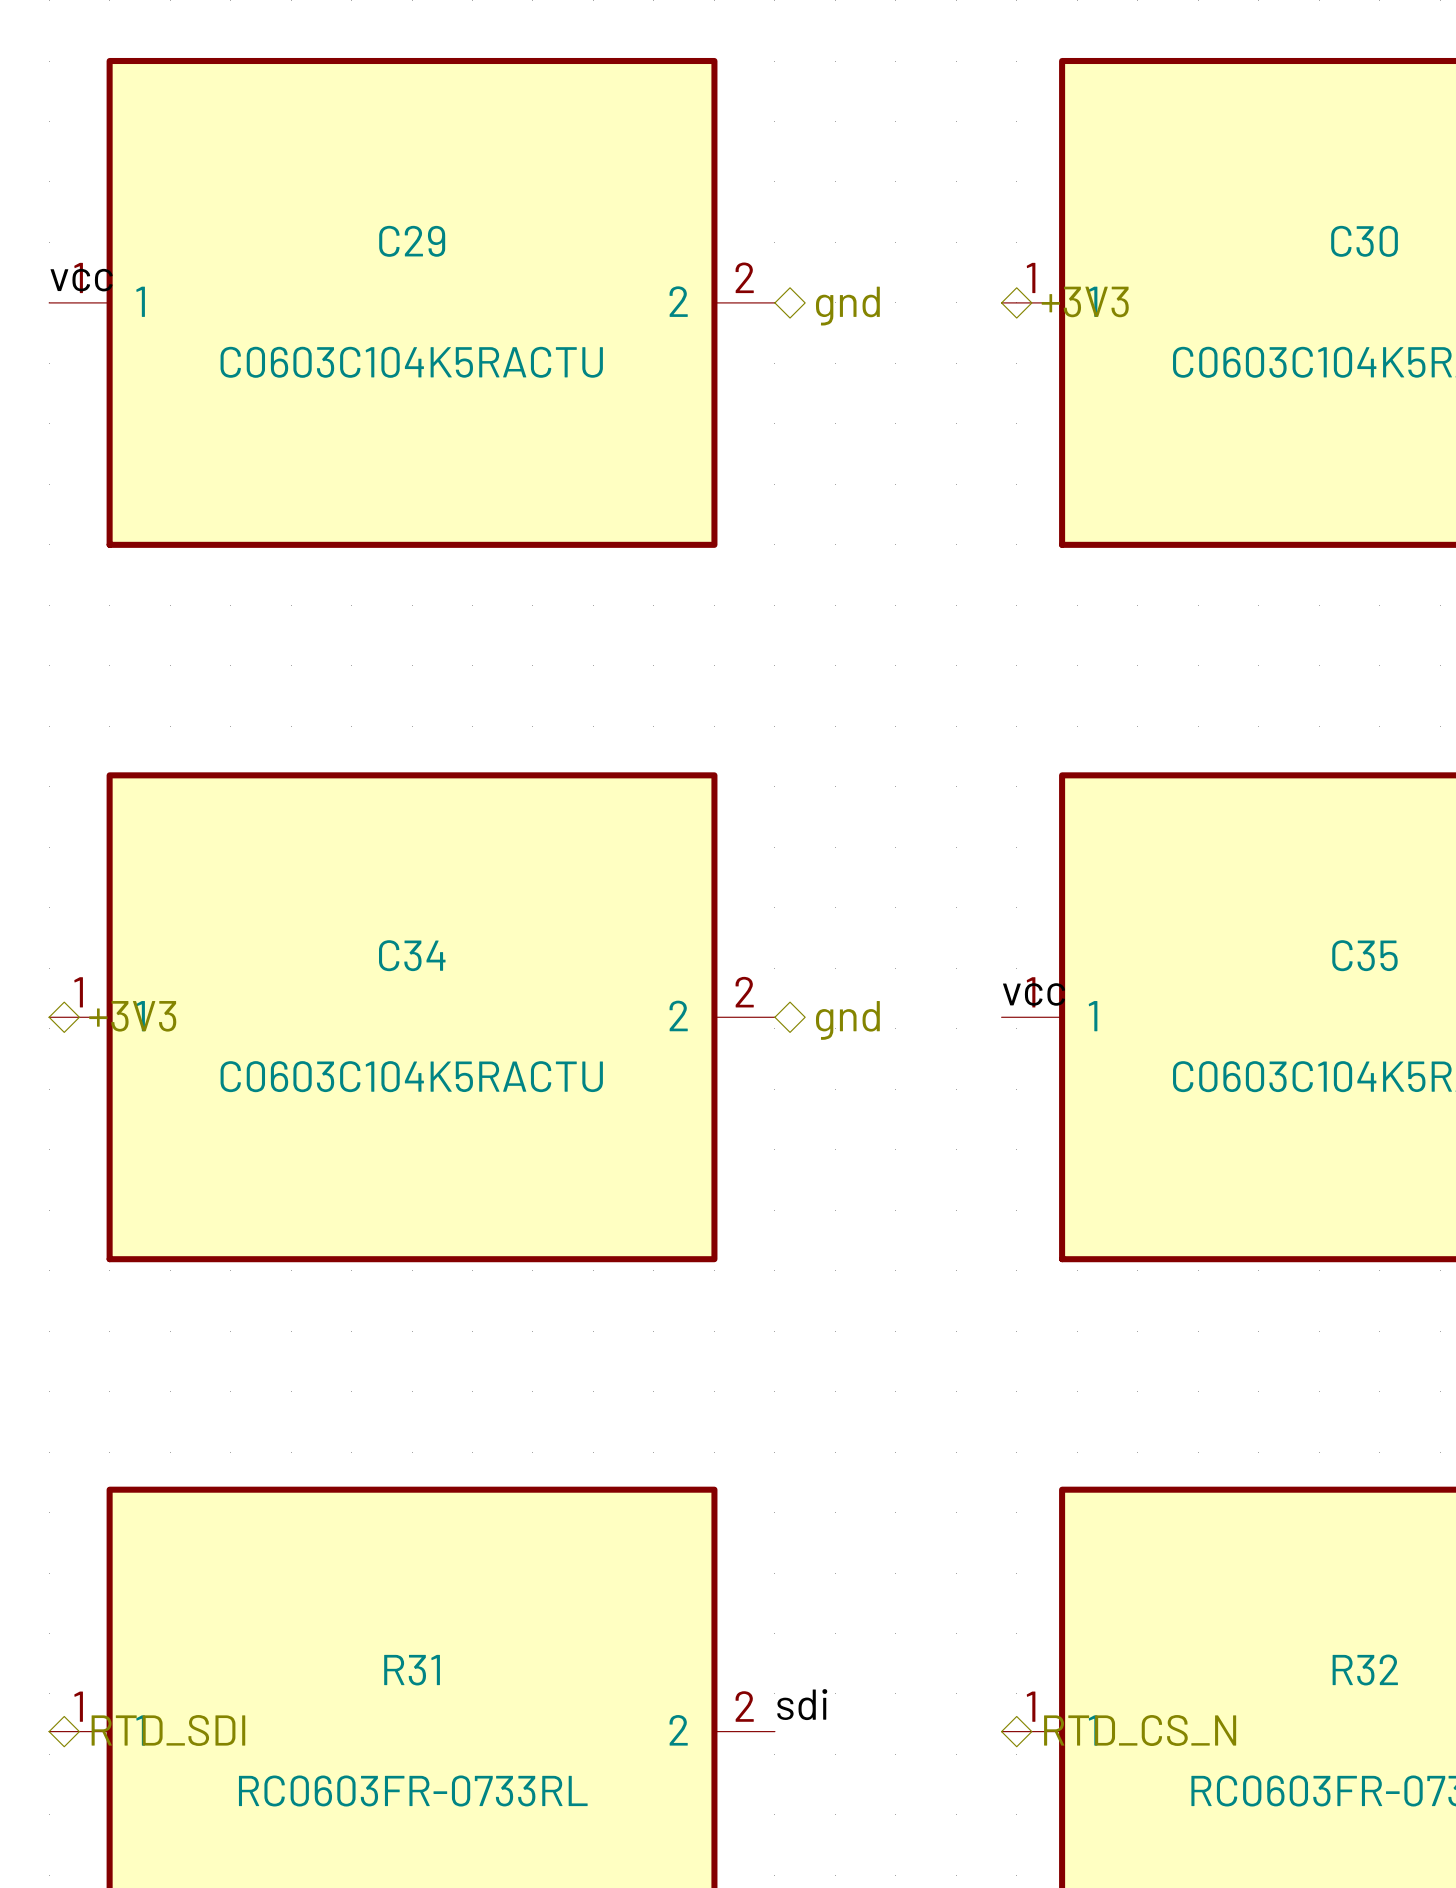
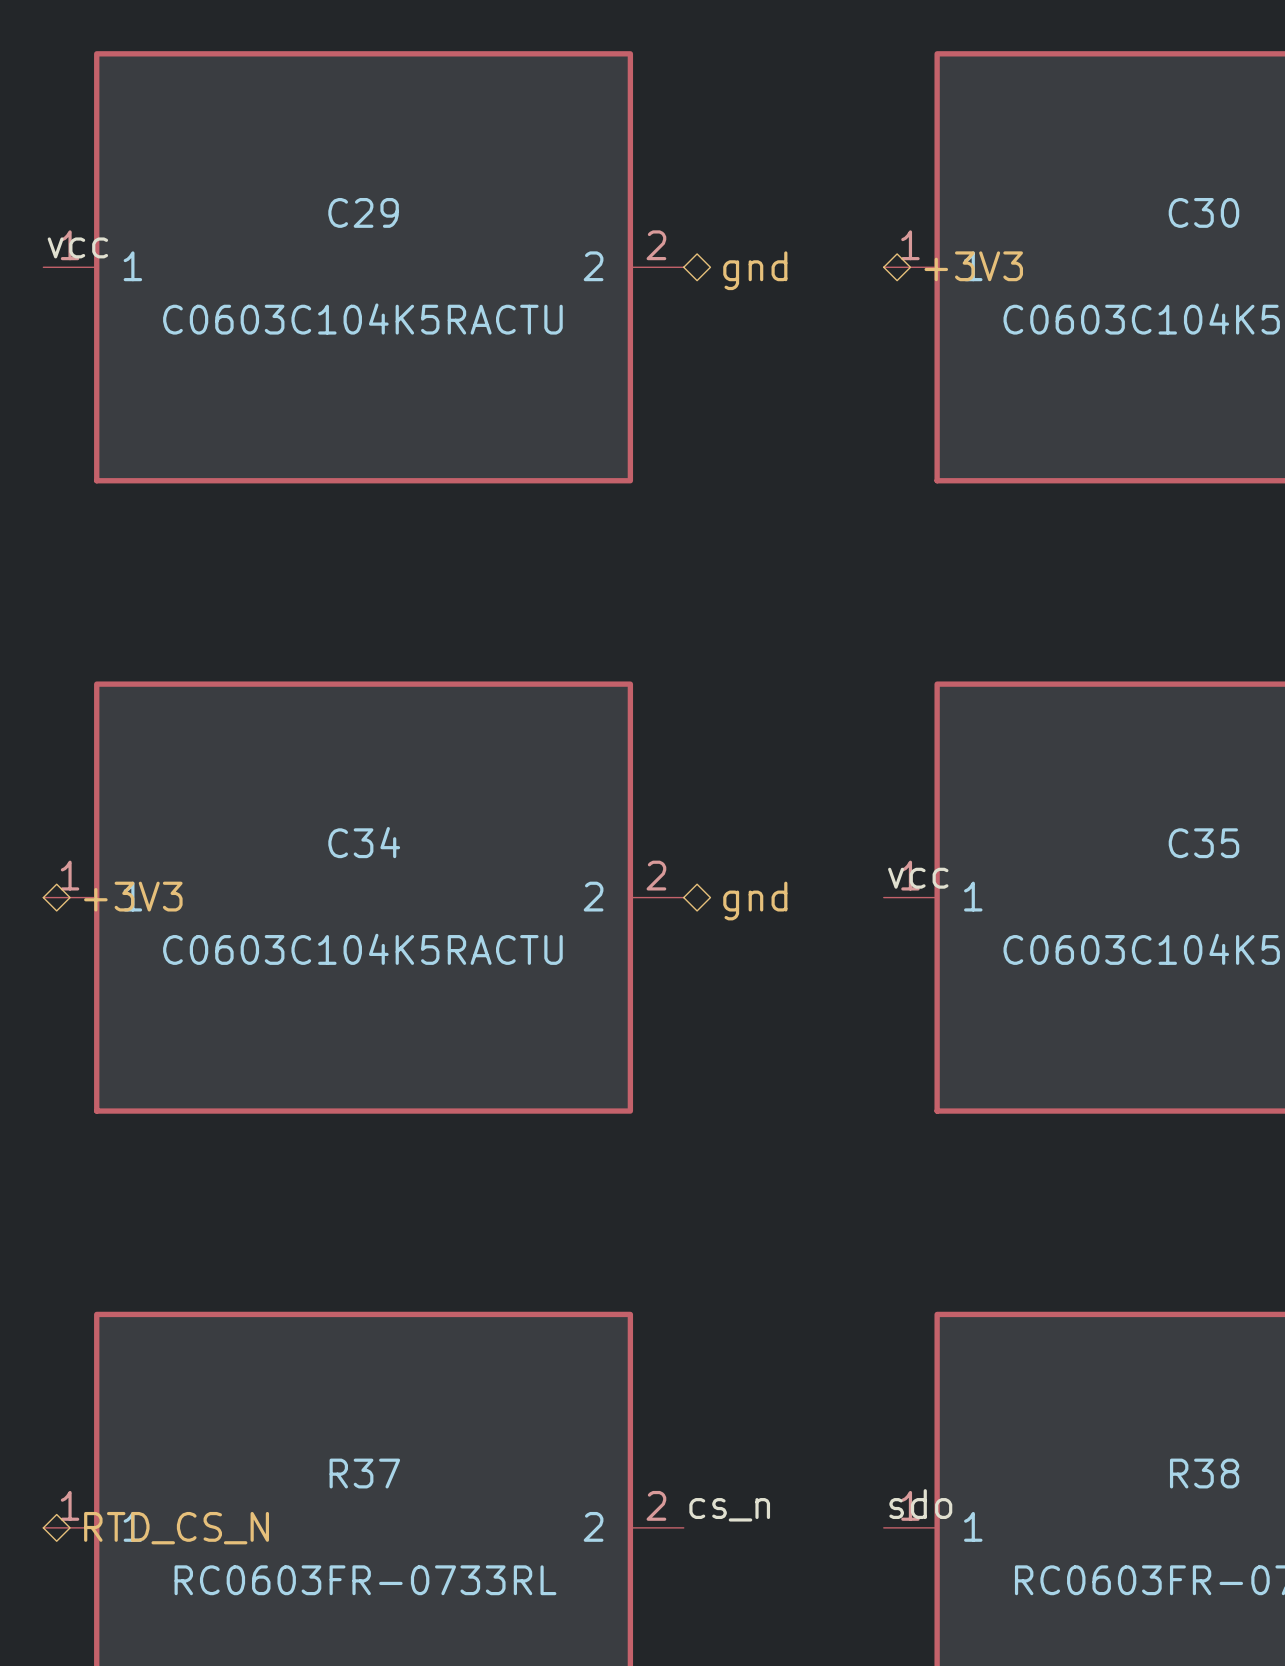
R31 name: R31 (412, 1670) -> R37 (364, 1473)
R32 name: R32 (1365, 1670) -> R38 (1204, 1473)
label: sdi (802, 1704) -> cs_n (729, 1509)
label: none -> sdo (920, 1504)
hierarchical label: RTD_SDI (168, 1730) -> RTD_CS_N (176, 1528)
hierarchical label: RTD_CS_N (1140, 1730) -> none

